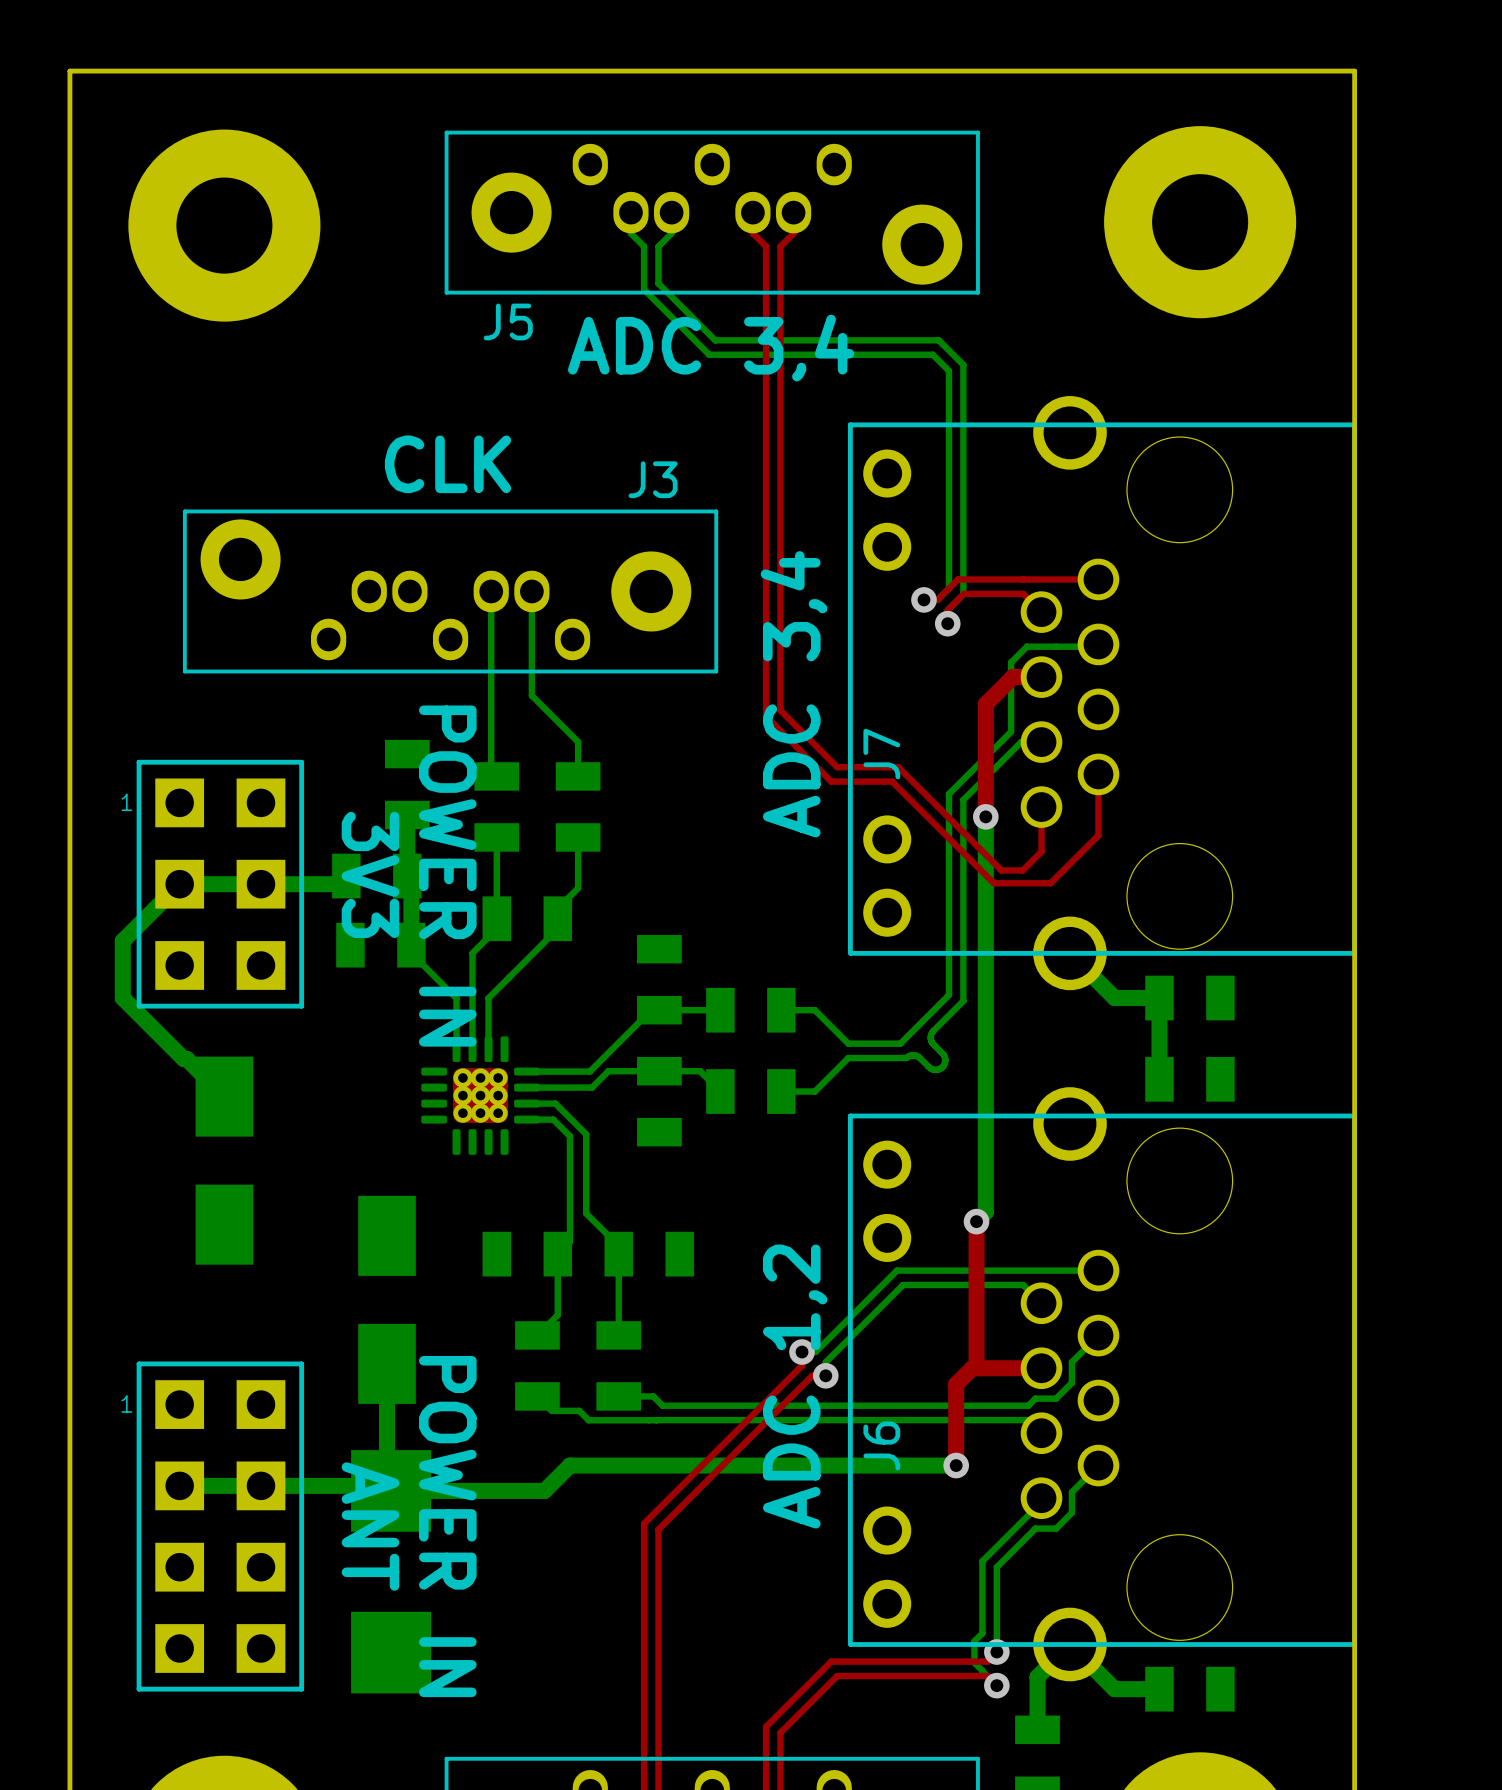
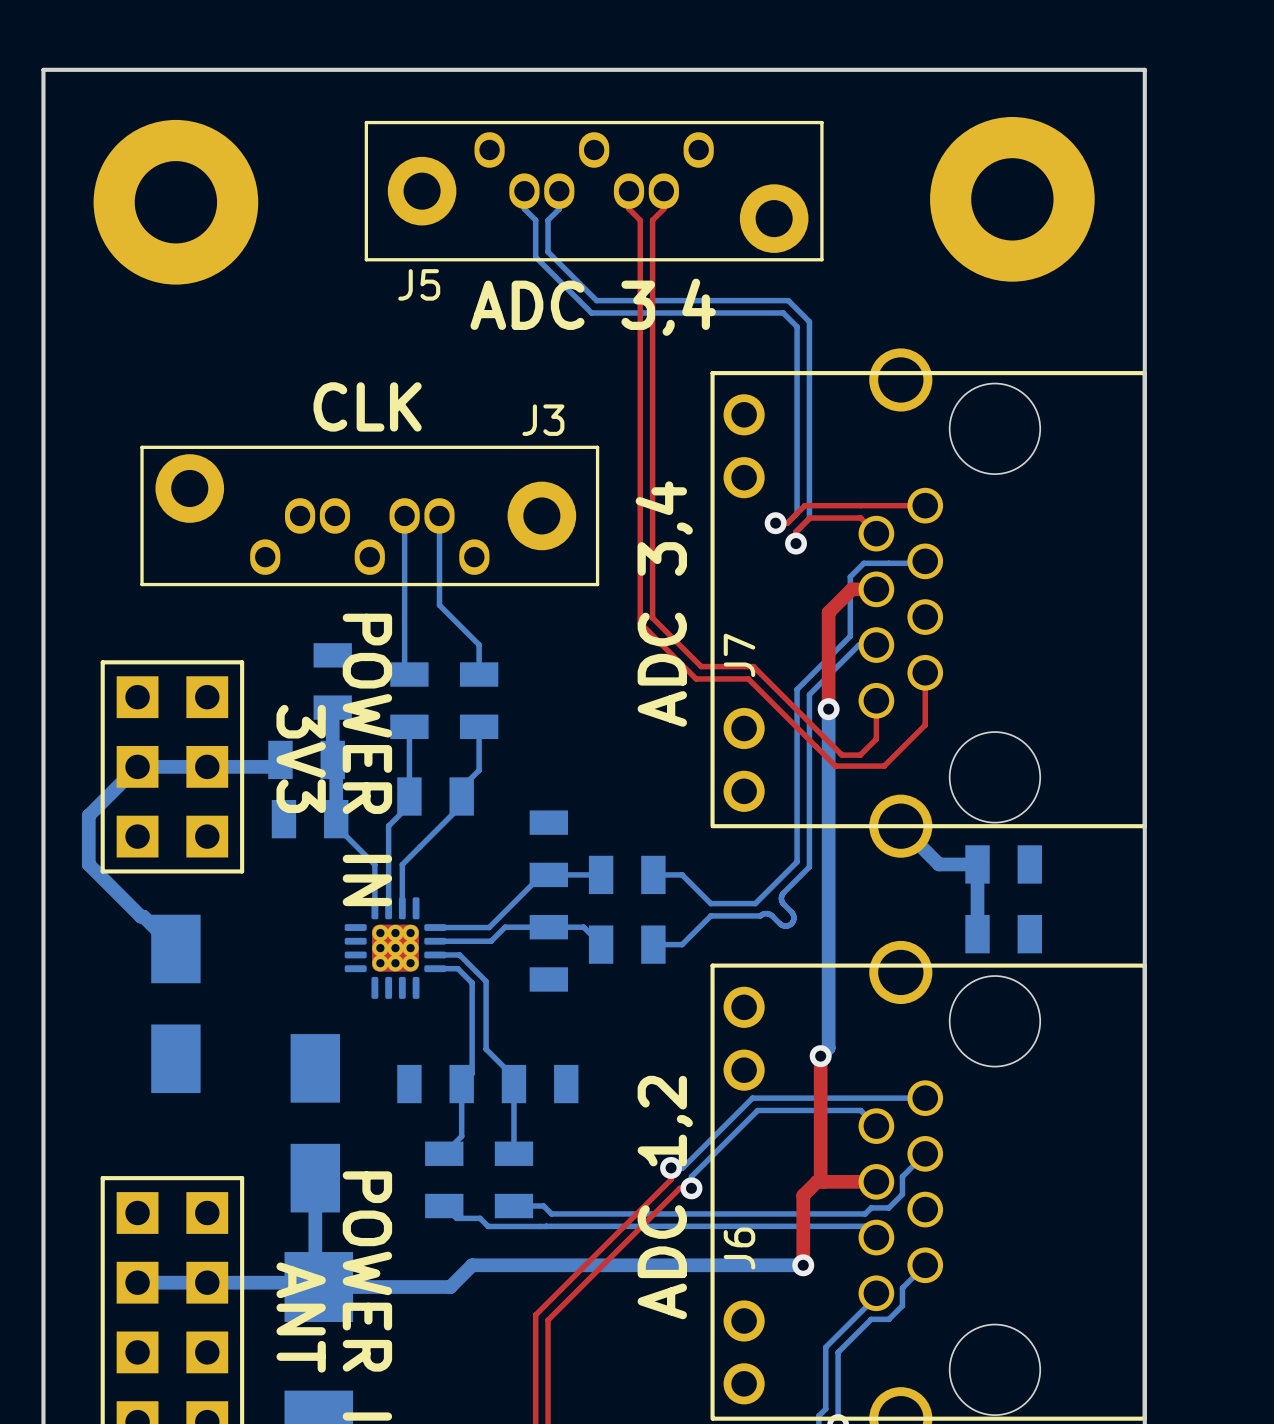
part text: 1 (126, 802) -> none
part text: 1 (126, 1403) -> none

